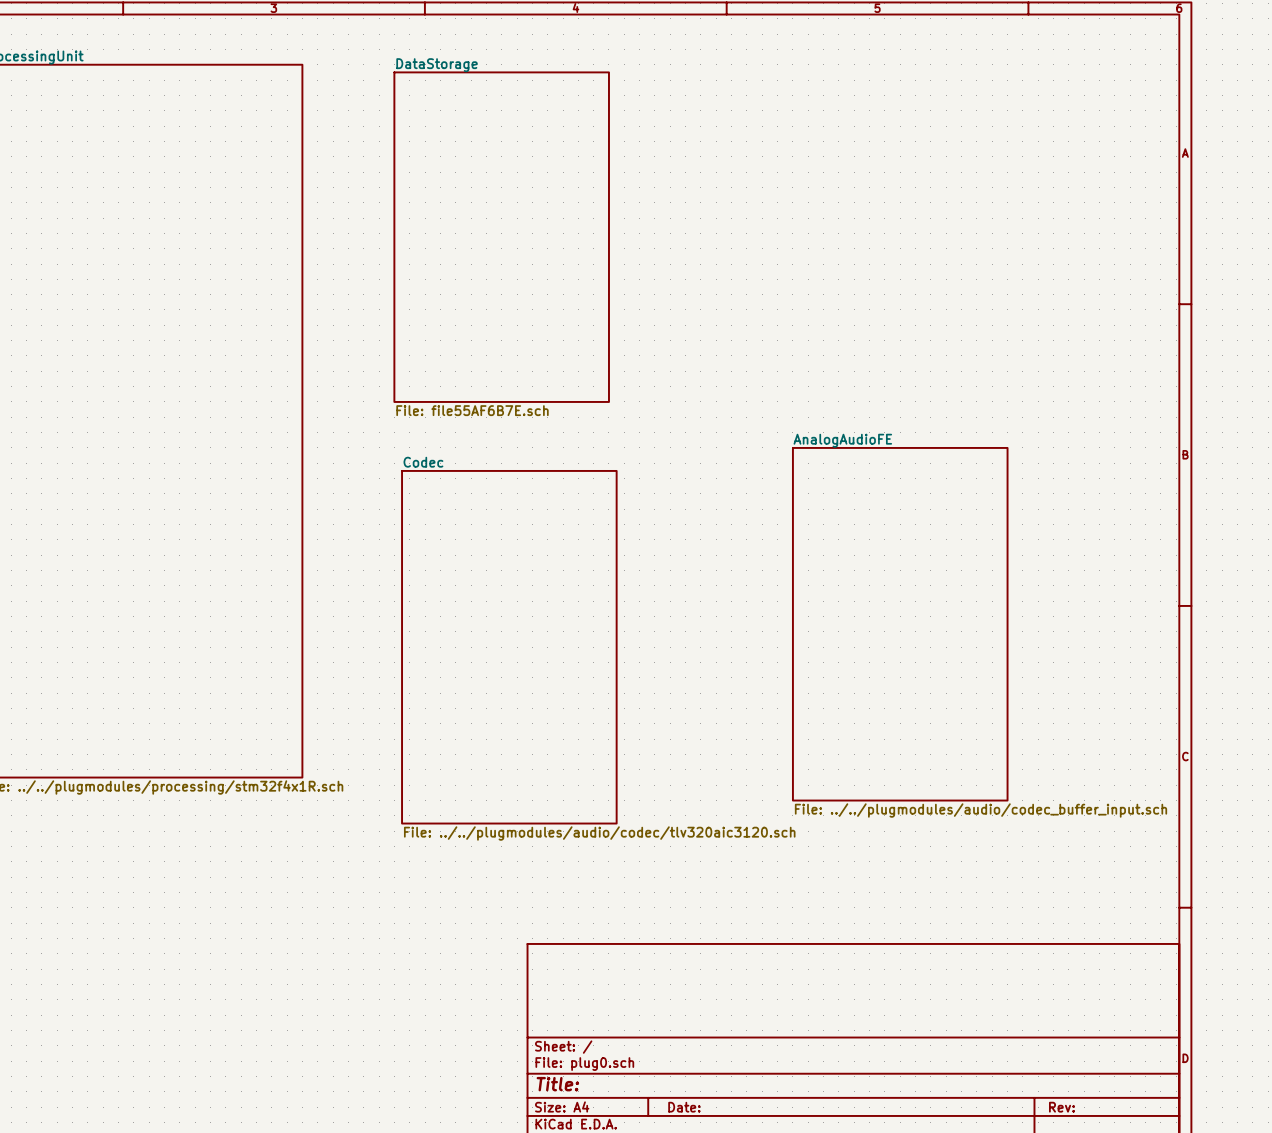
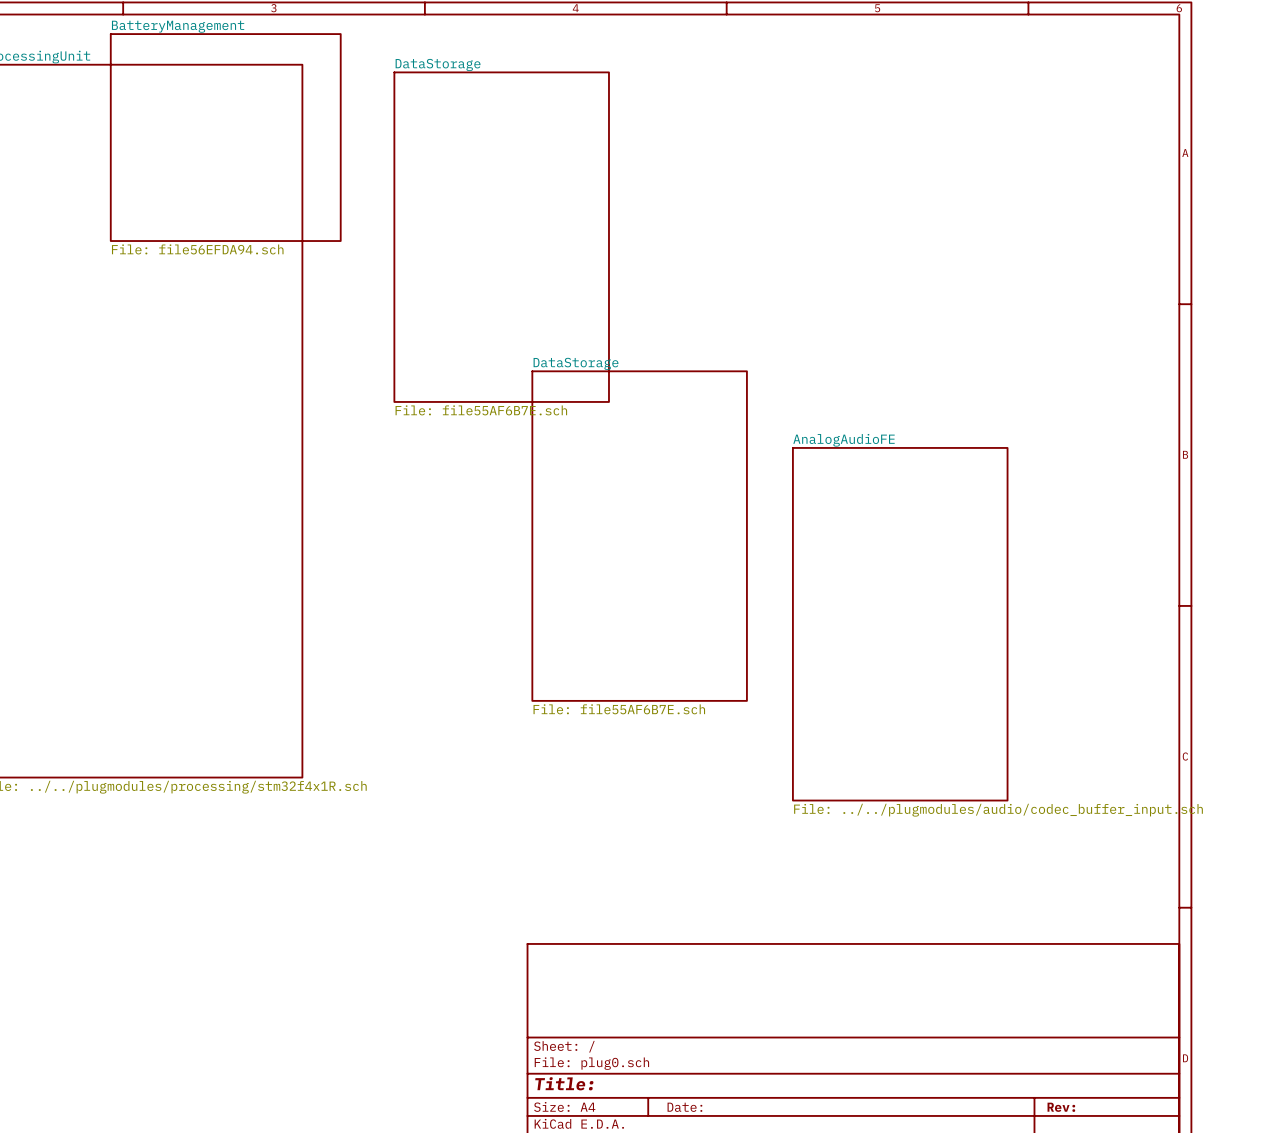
sheet BatteryManagement: none -> File: file56EFDA94.sch (225, 137)
sheet DataStorage: none -> File: file55AF6B7E.sch (639, 536)
sheet Codec: File: ../../plugmodules/audio/codec/tlv320aic3120.sch (509, 647) -> none

